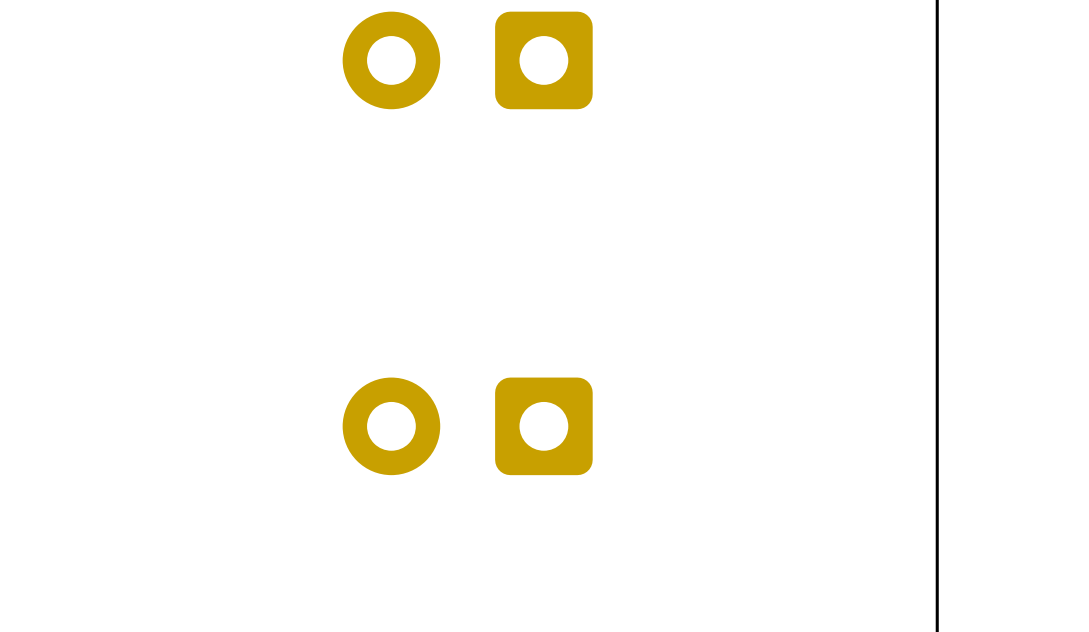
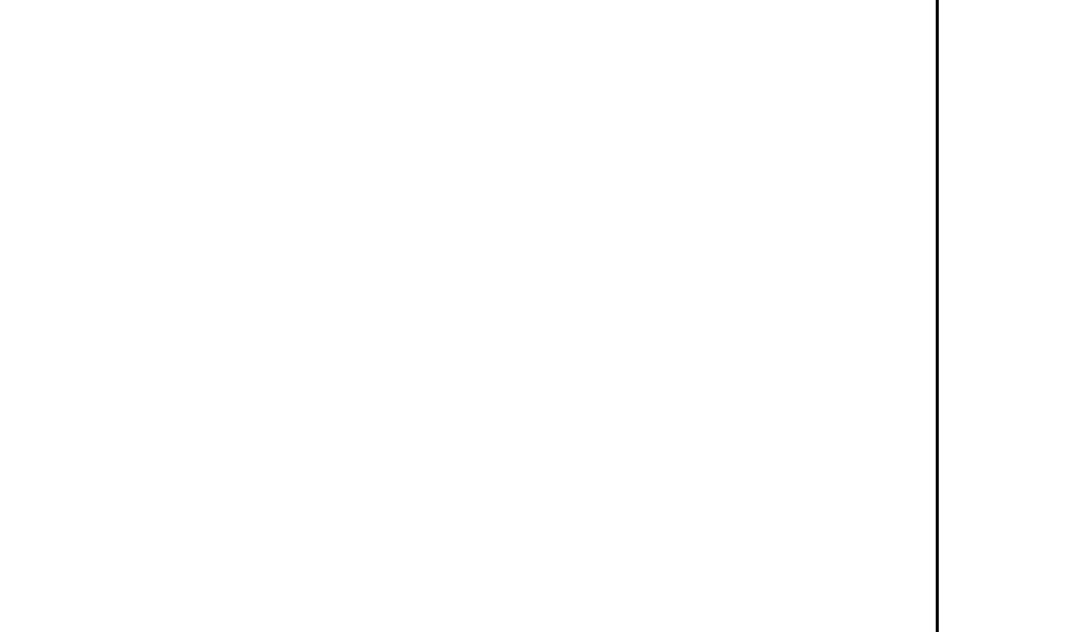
part: (467, 60) -> none
part: (467, 426) -> none

